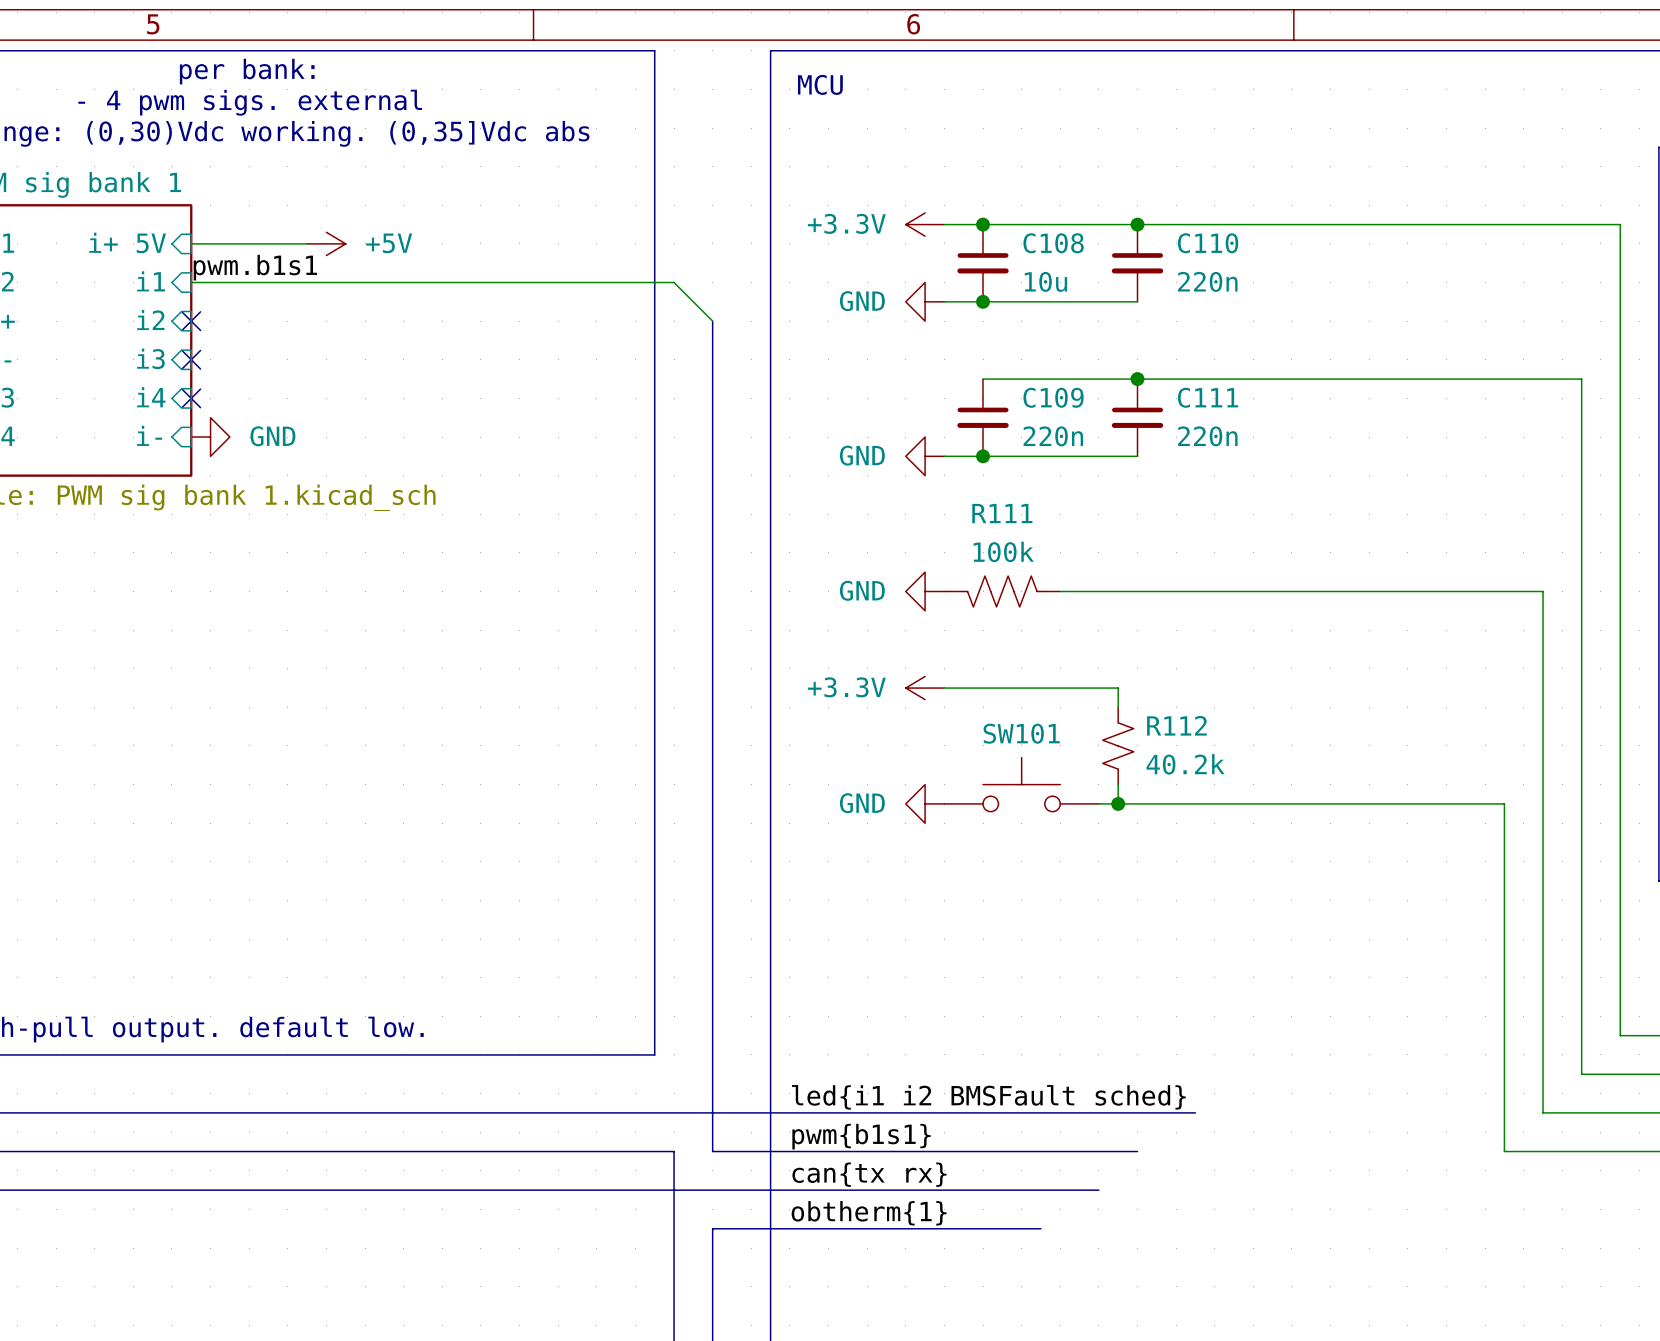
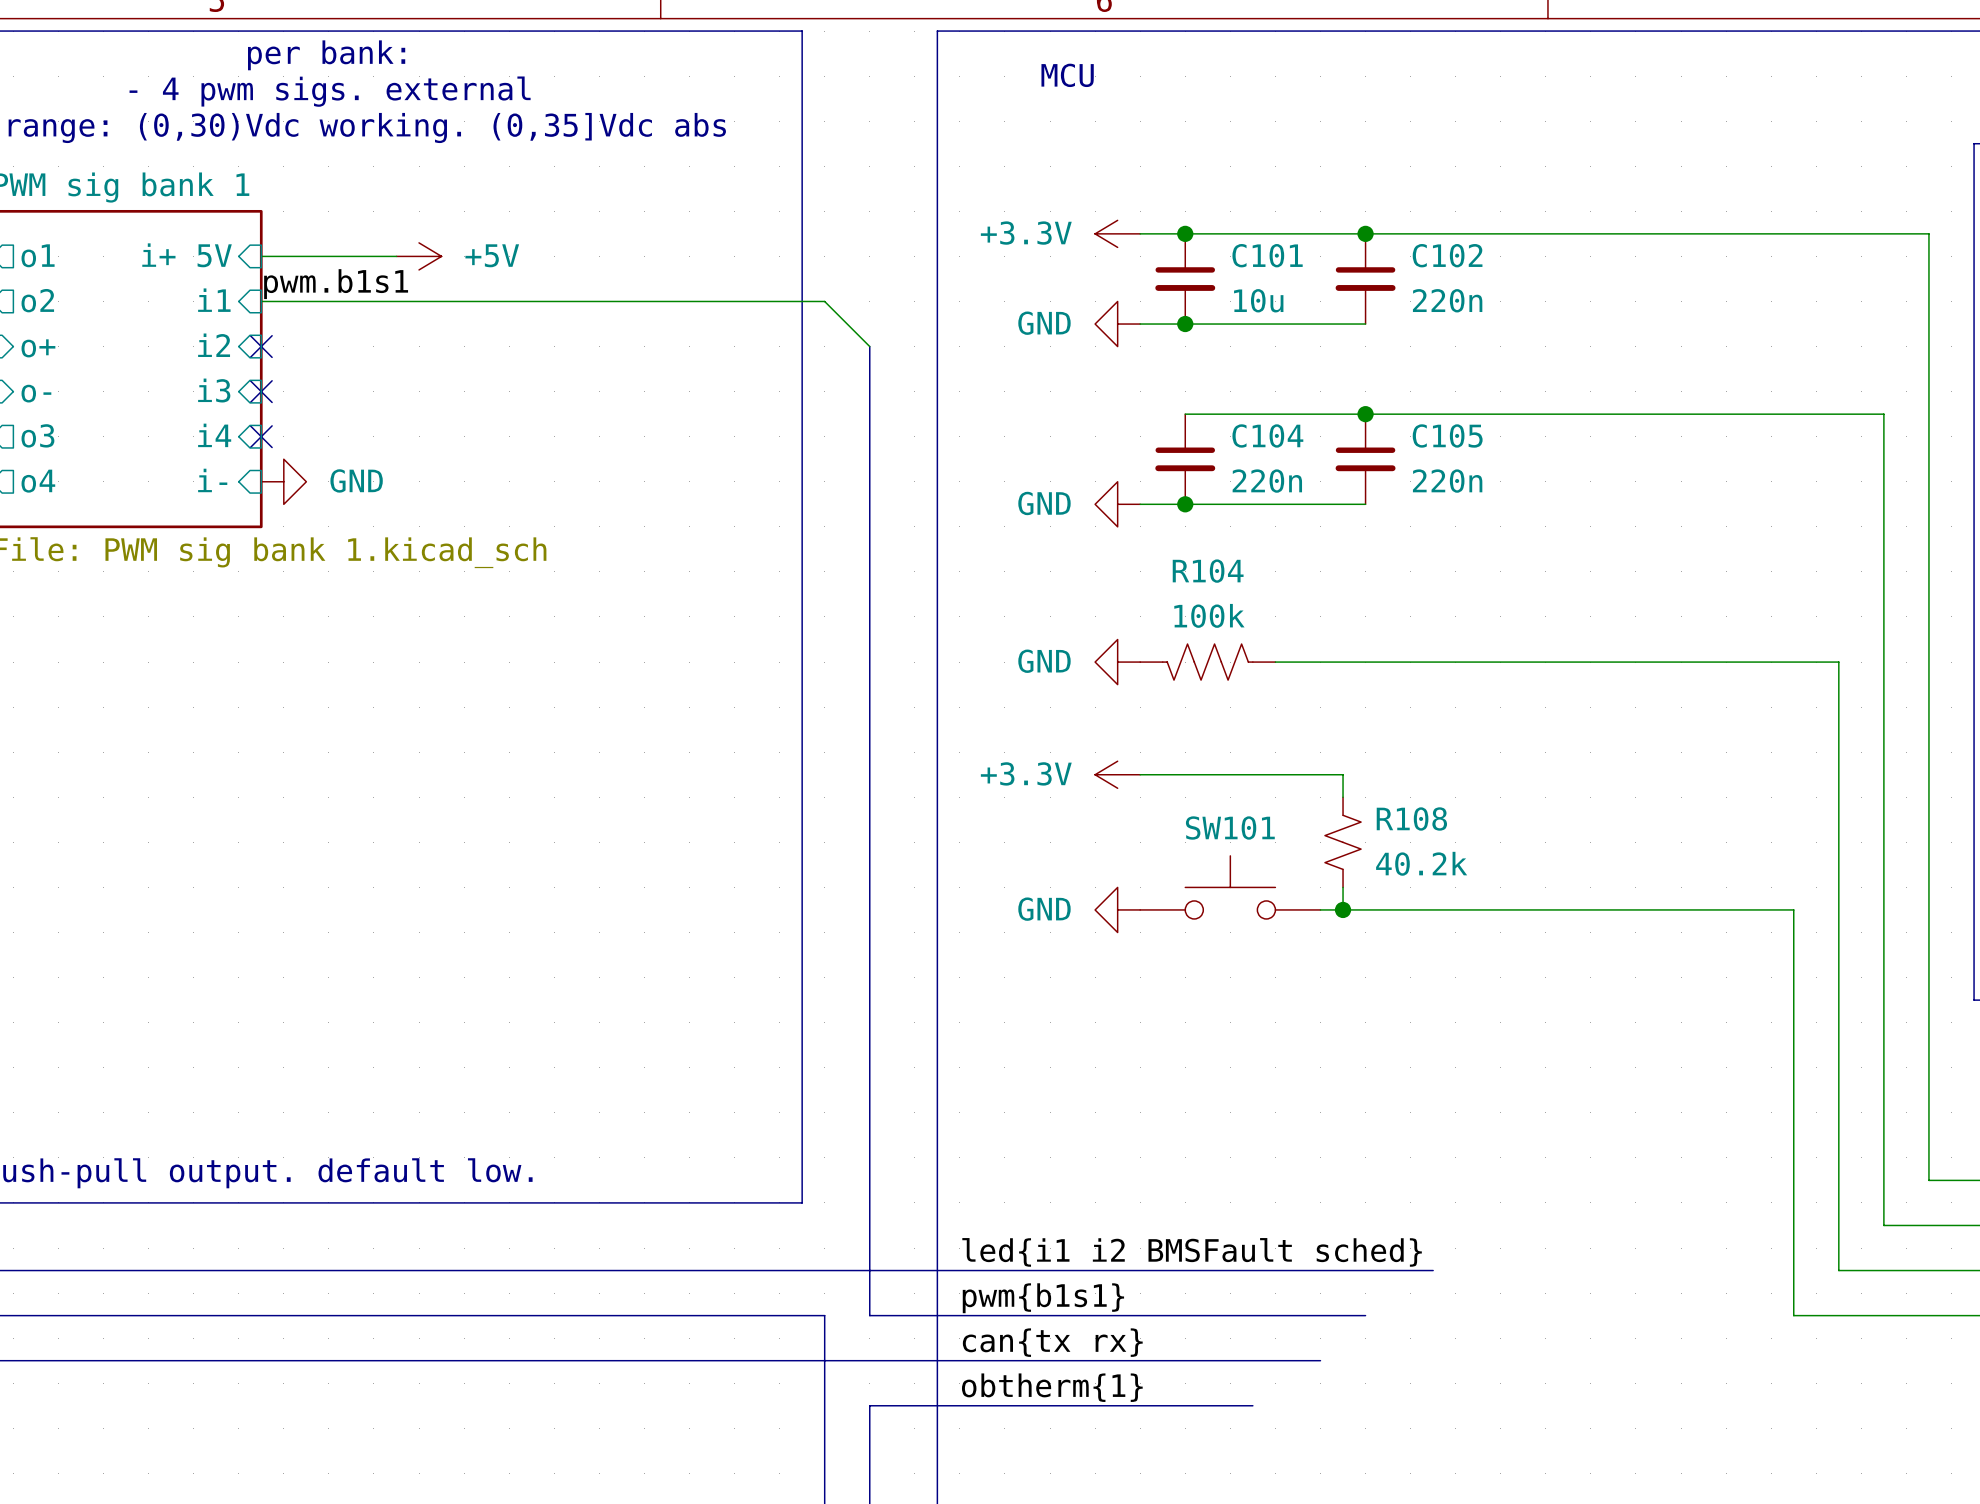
text position: MCU (820, 84) -> MCU (1067, 75)
C108 name: C108 (1053, 243) -> C101 (1267, 255)
C110 name: C110 (1208, 243) -> C102 (1447, 255)
C109 name: C109 (1053, 397) -> C104 (1267, 435)
C111 name: C111 (1208, 397) -> C105 (1447, 435)
R111 name: R111 (1002, 513) -> R104 (1208, 571)
R112 name: R112 (1176, 725) -> R108 (1411, 818)

